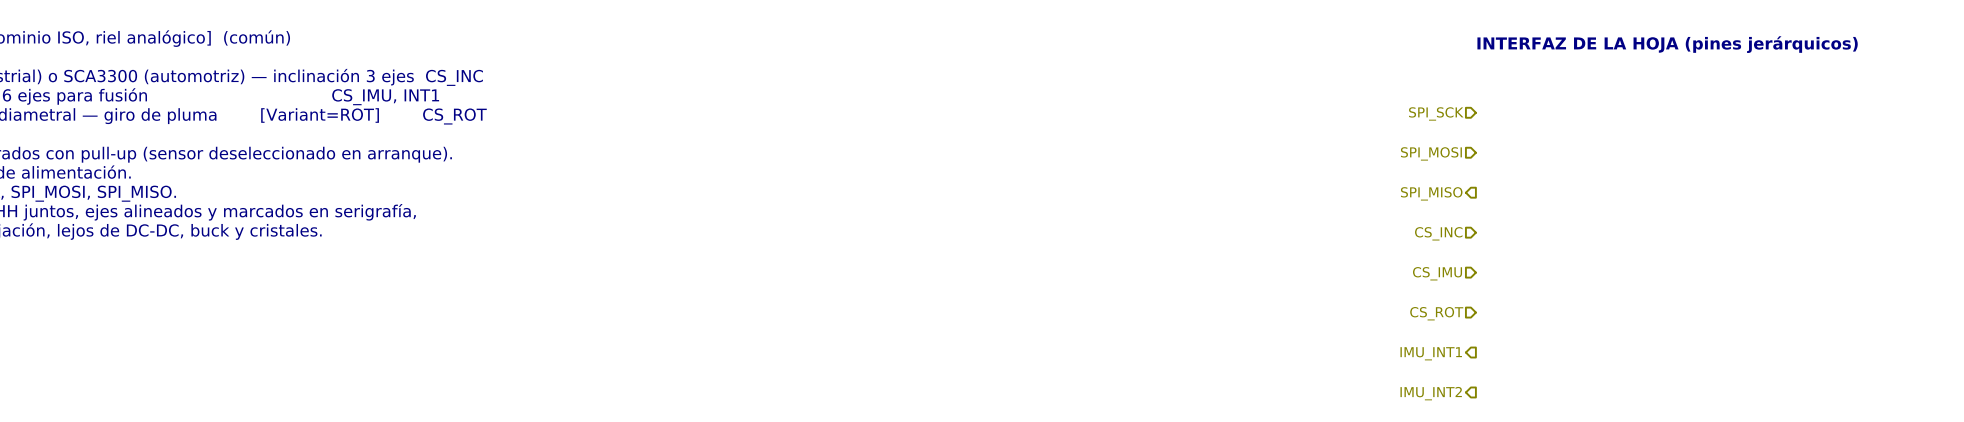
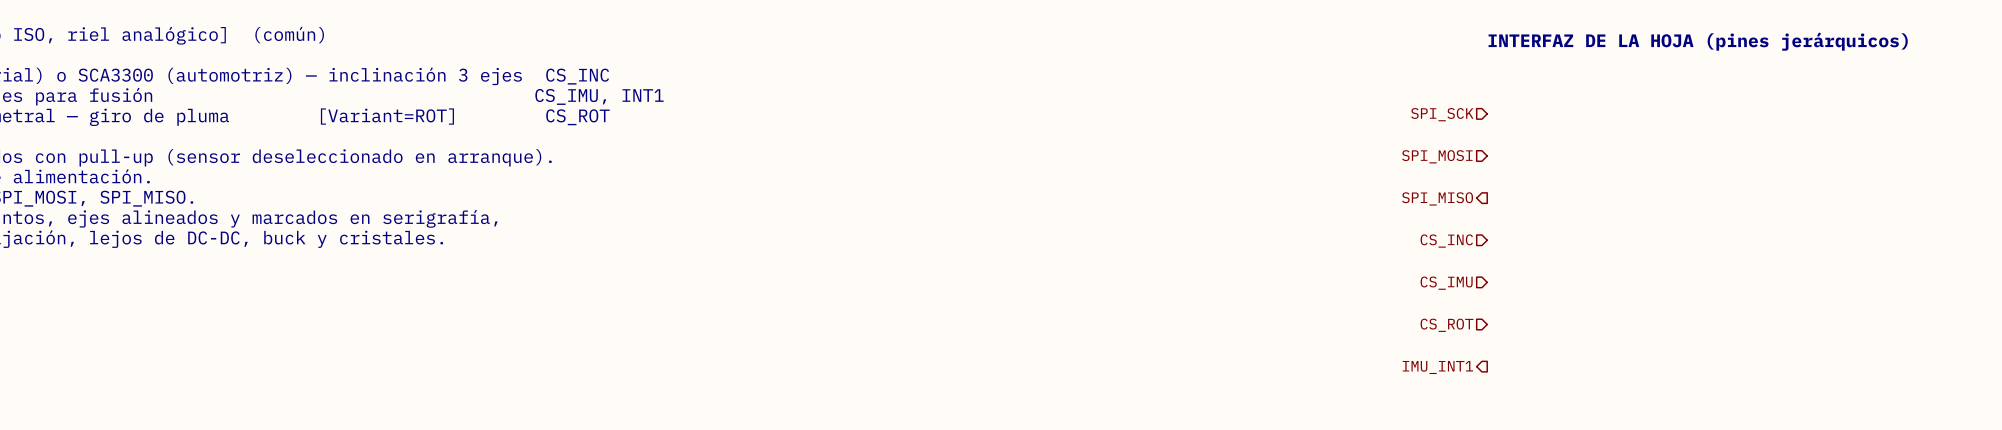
hierarchical label: IMU_INT2 (1431, 393) -> none

